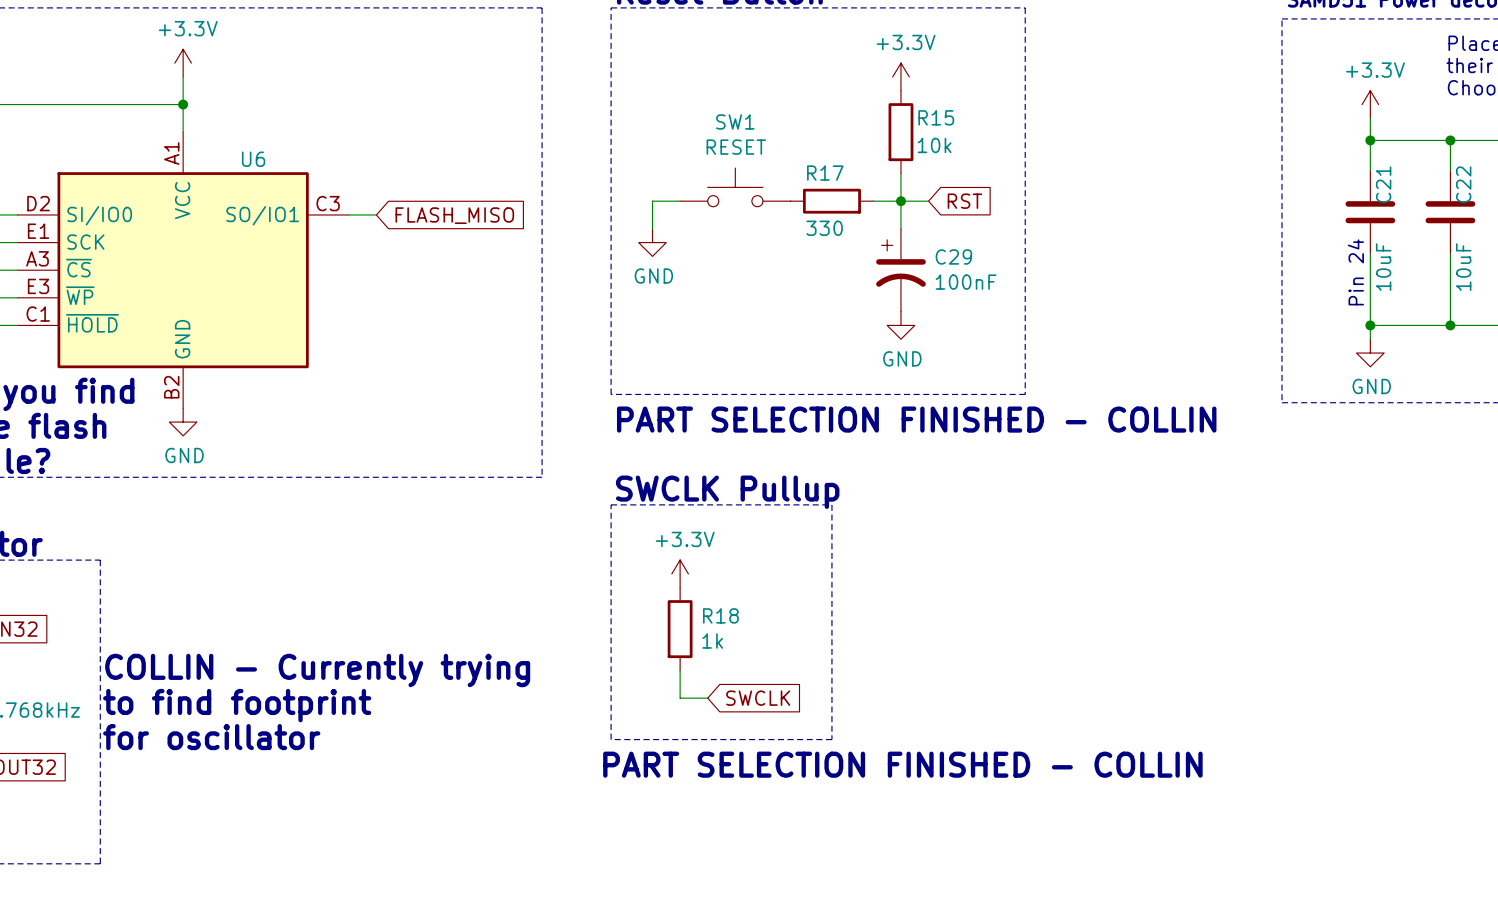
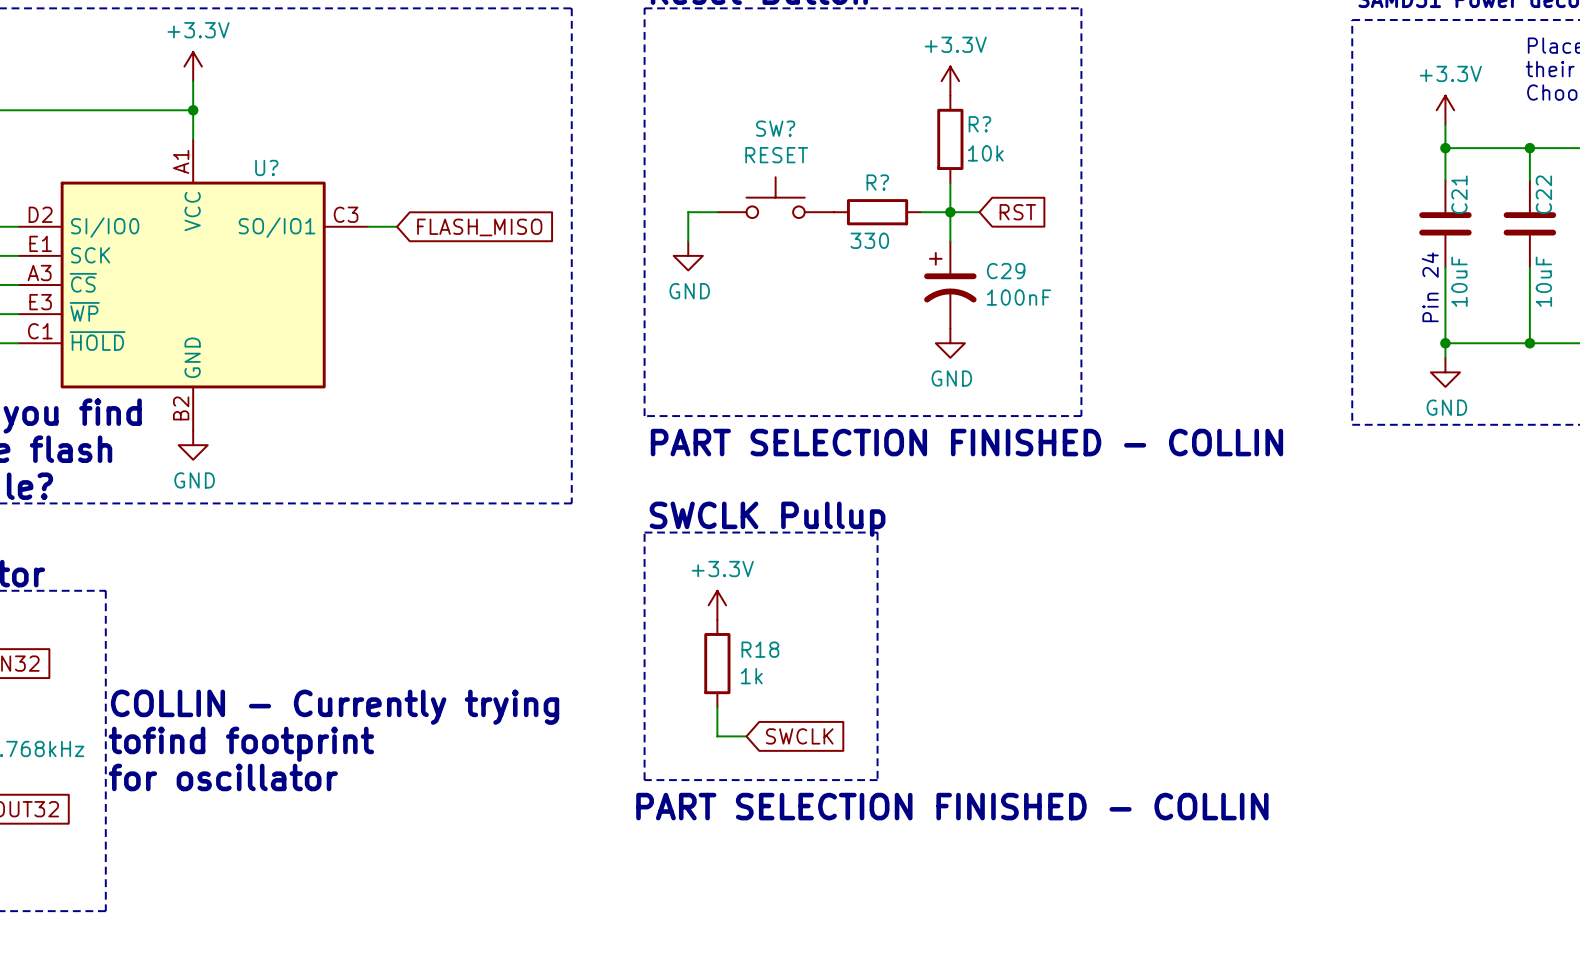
R15 name: R15 (936, 117) -> R? (979, 124)
SW1 name: SW1 (735, 121) -> SW? (775, 128)
U6 name: U6 (253, 159) -> U? (266, 167)
R17 name: R17 (825, 173) -> R? (877, 182)
text: to find footprint (237, 705) -> tofind footprint (241, 744)

